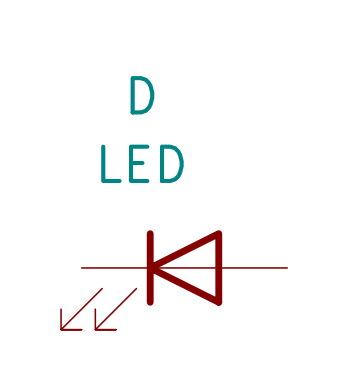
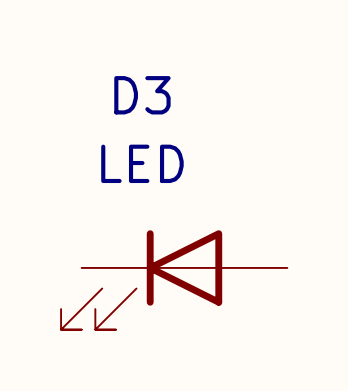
D name: D (142, 95) -> D3 (142, 95)

